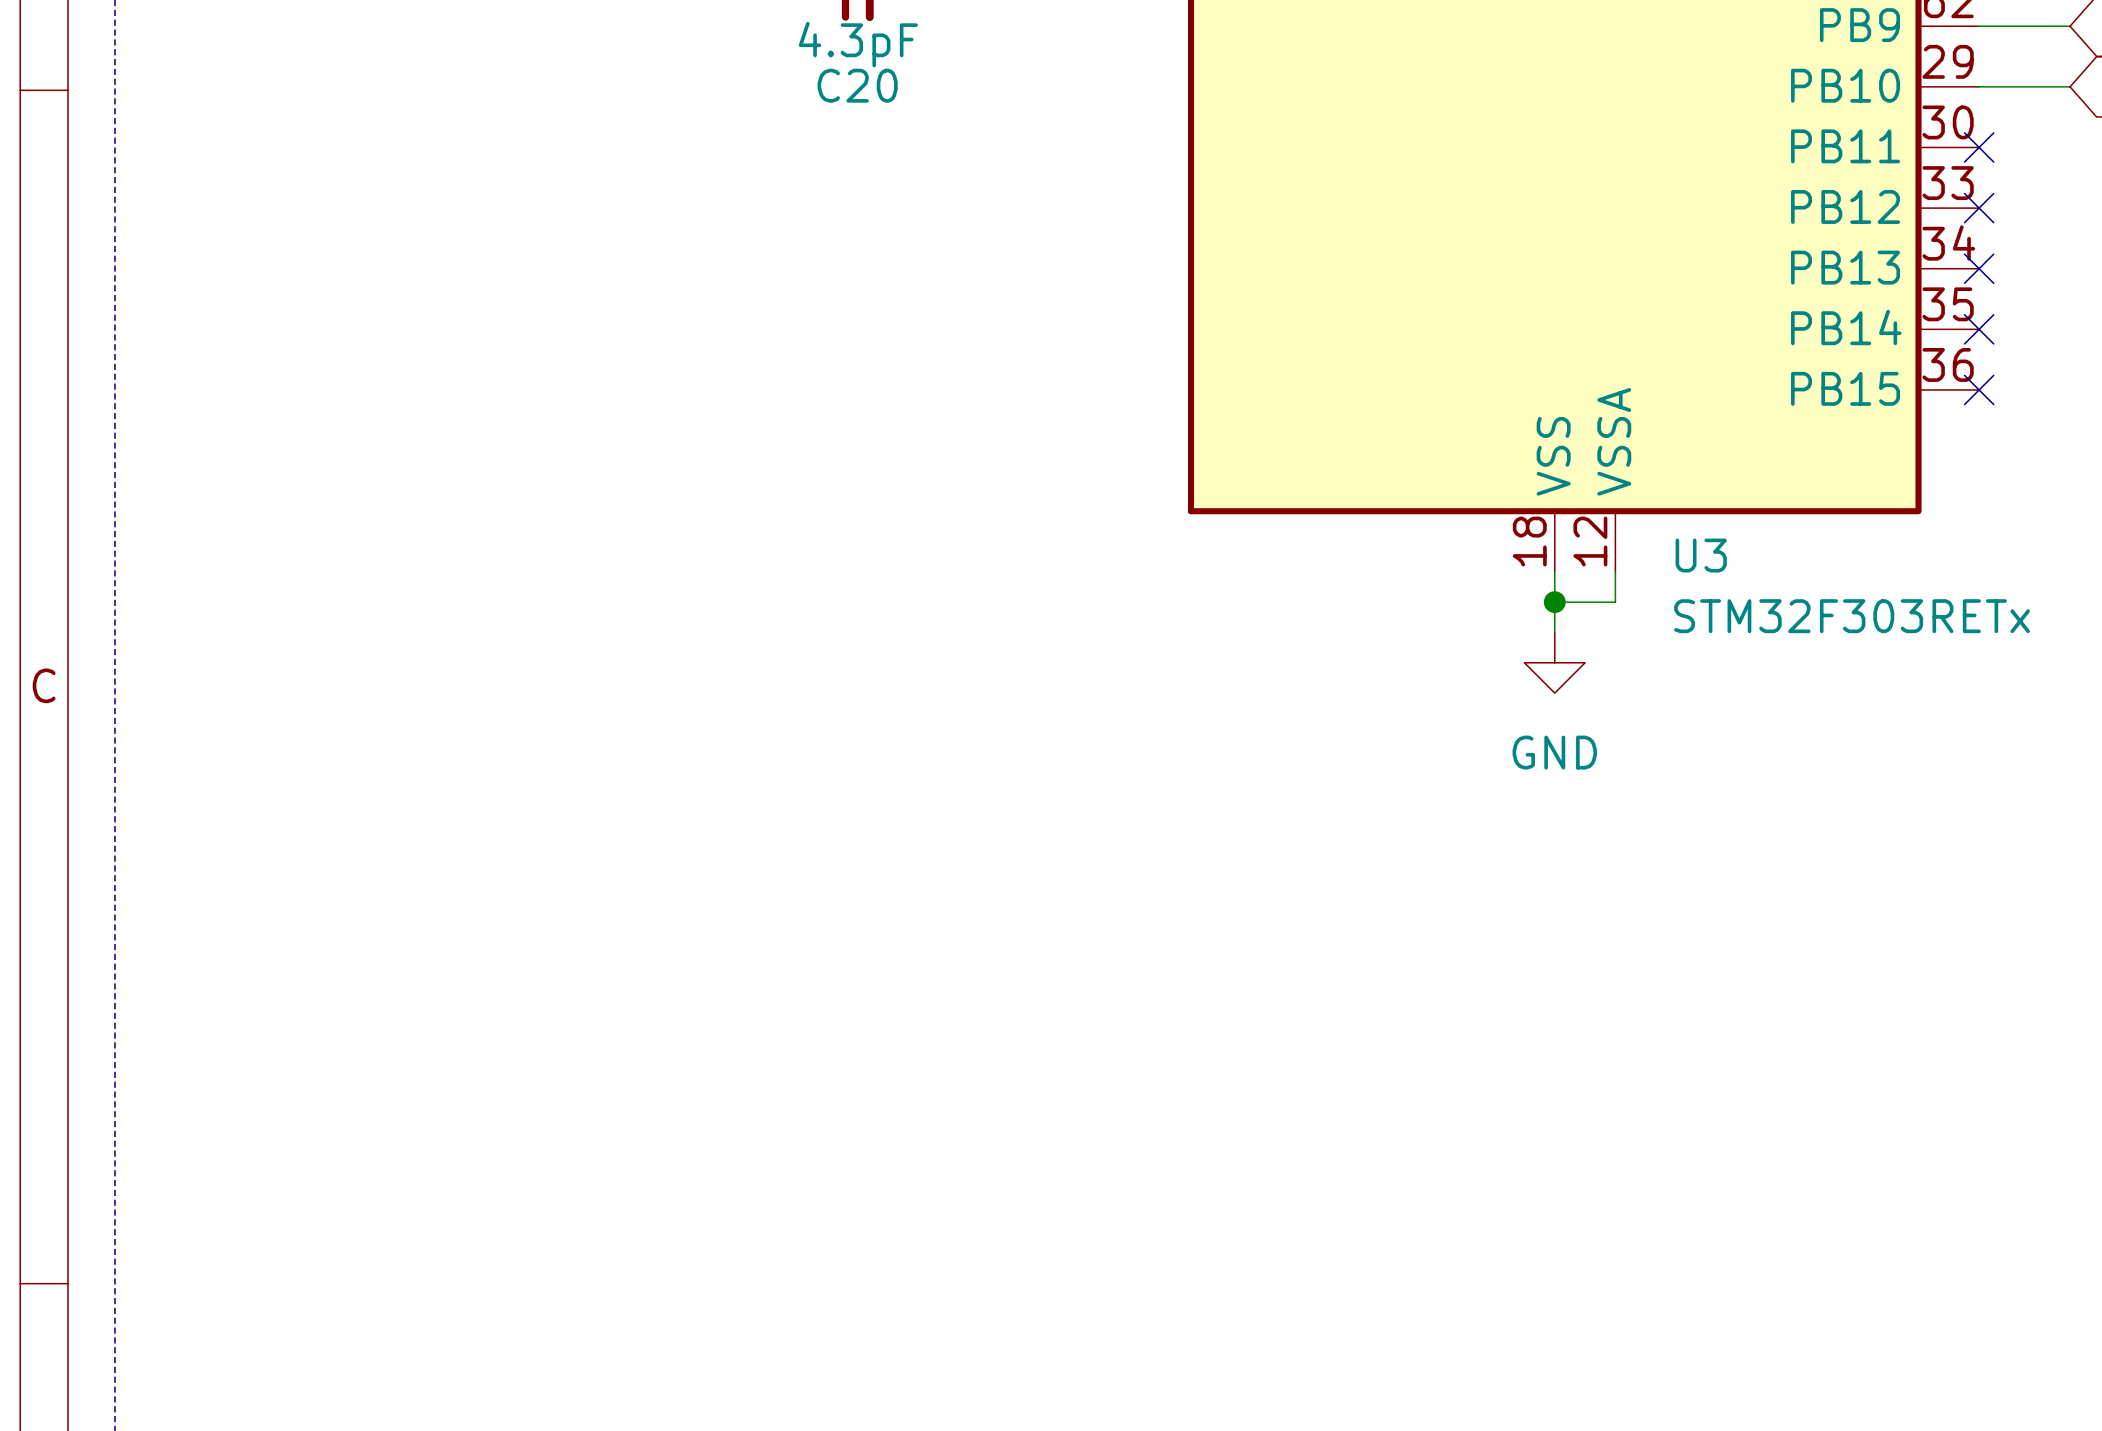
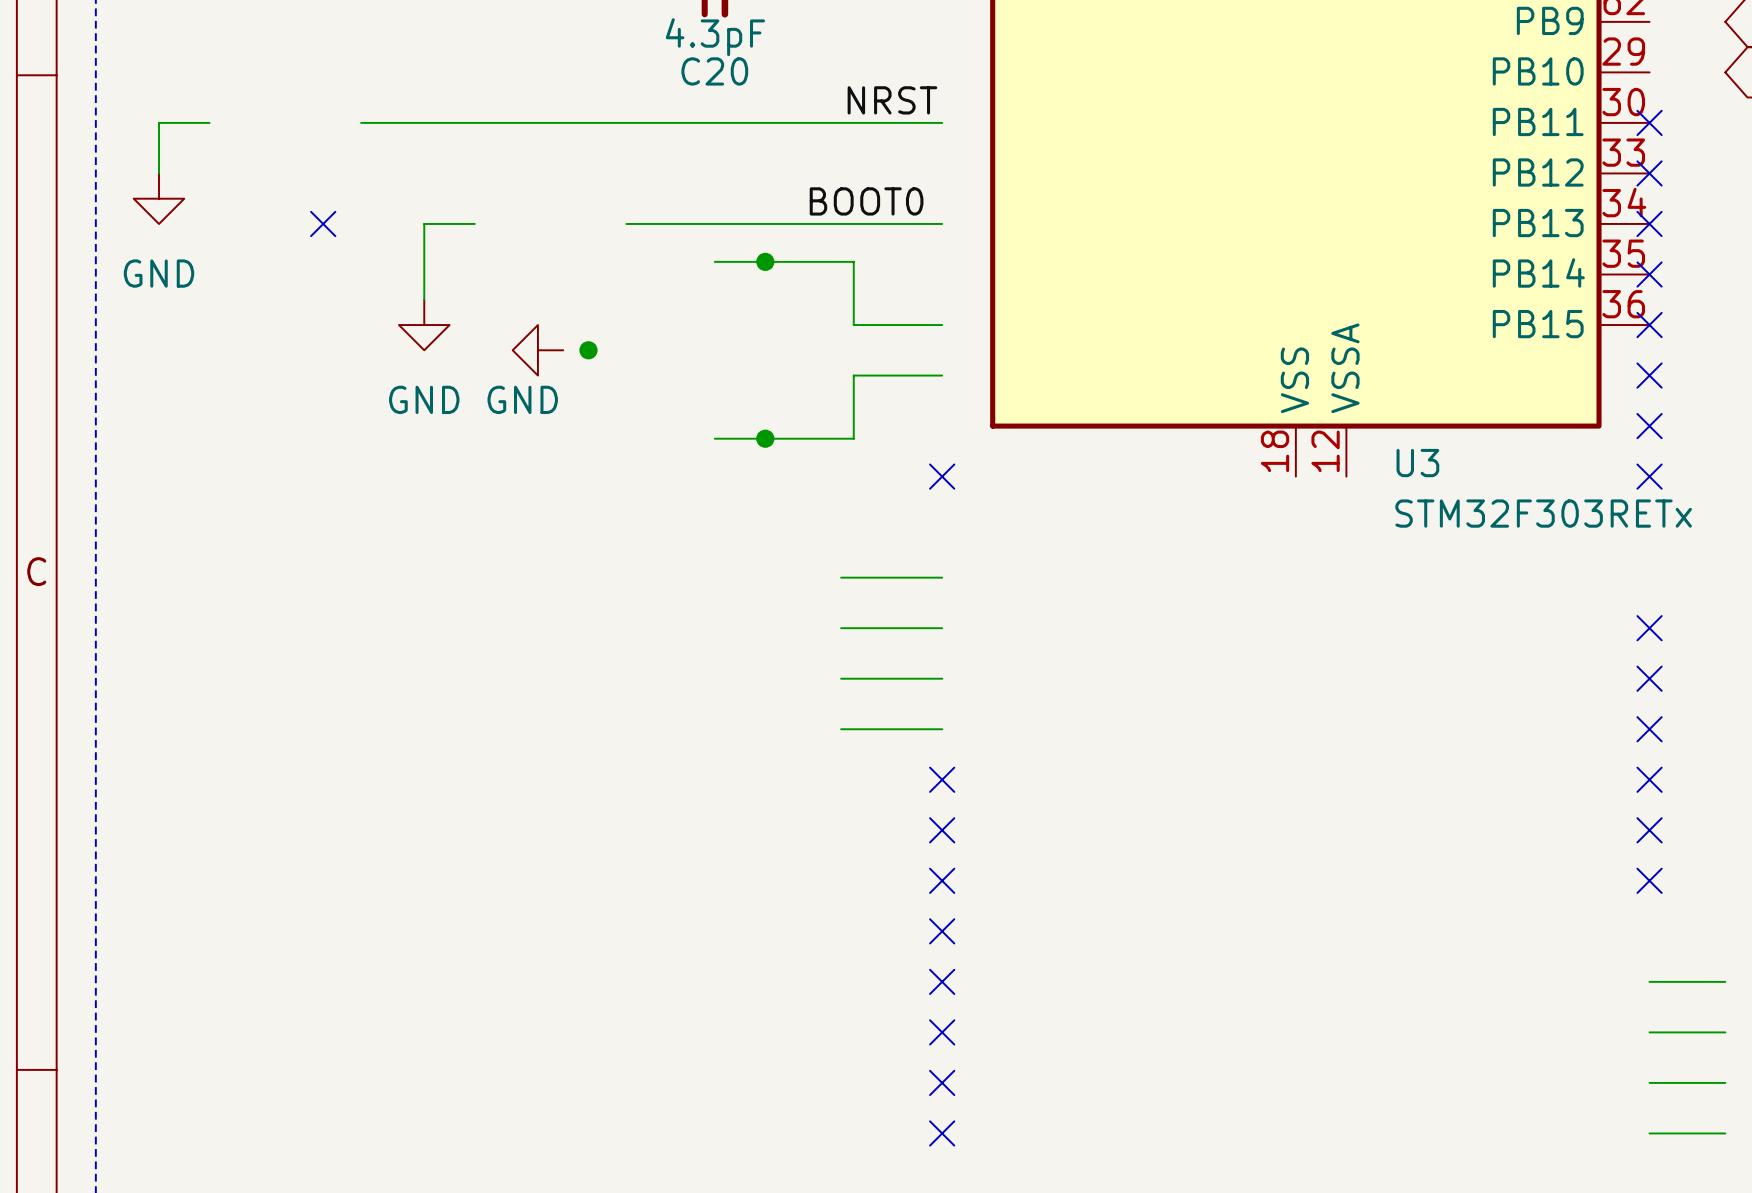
wire: (1979, 26) (2070, 26) -> none
wire: (1979, 86) (2070, 86) -> none
label: none -> NRST (892, 100)
wire: none -> (209, 122) (159, 122) (159, 173)
wire: none -> (361, 122) (942, 122)
power symbol: none -> GND (159, 198)
label: none -> BOOT0 (866, 201)
no-connect mark: none -> (323, 223)
wire: none -> (474, 223) (424, 223) (424, 299)
wire: none -> (626, 223) (942, 223)
wire: none -> (714, 261) (853, 261) (853, 325) (942, 325)
junction: none -> (765, 261)
power symbol: none -> GND (424, 325)
power symbol: none -> GND (537, 350)
junction: none -> (588, 350)
wire: none -> (942, 375) (853, 375) (853, 438) (714, 438)
no-connect mark: none -> (1649, 375)
no-connect mark: none -> (1649, 426)
junction: none -> (765, 438)
no-connect mark: none -> (942, 476)
wire: (1554, 571) (1554, 632) -> none
wire: (1615, 571) (1615, 602) (1554, 602) -> none
no-connect mark: none -> (1649, 476)
junction: (1554, 602) -> none
power symbol: GND (1554, 662) -> none
wire: none -> (841, 577) (942, 577)
wire: none -> (841, 628) (942, 628)
no-connect mark: none -> (1649, 628)
wire: none -> (841, 678) (942, 678)
no-connect mark: none -> (1649, 678)
wire: none -> (841, 729) (942, 729)
no-connect mark: none -> (1649, 729)
no-connect mark: none -> (942, 779)
no-connect mark: none -> (1649, 779)
no-connect mark: none -> (942, 830)
no-connect mark: none -> (1649, 830)
no-connect mark: none -> (942, 880)
no-connect mark: none -> (1649, 880)
no-connect mark: none -> (942, 931)
no-connect mark: none -> (942, 981)
wire: none -> (1649, 981) (1725, 981)
no-connect mark: none -> (942, 1032)
wire: none -> (1649, 1032) (1725, 1032)
no-connect mark: none -> (942, 1082)
wire: none -> (1649, 1082) (1725, 1082)
no-connect mark: none -> (942, 1133)
wire: none -> (1649, 1133) (1725, 1133)

